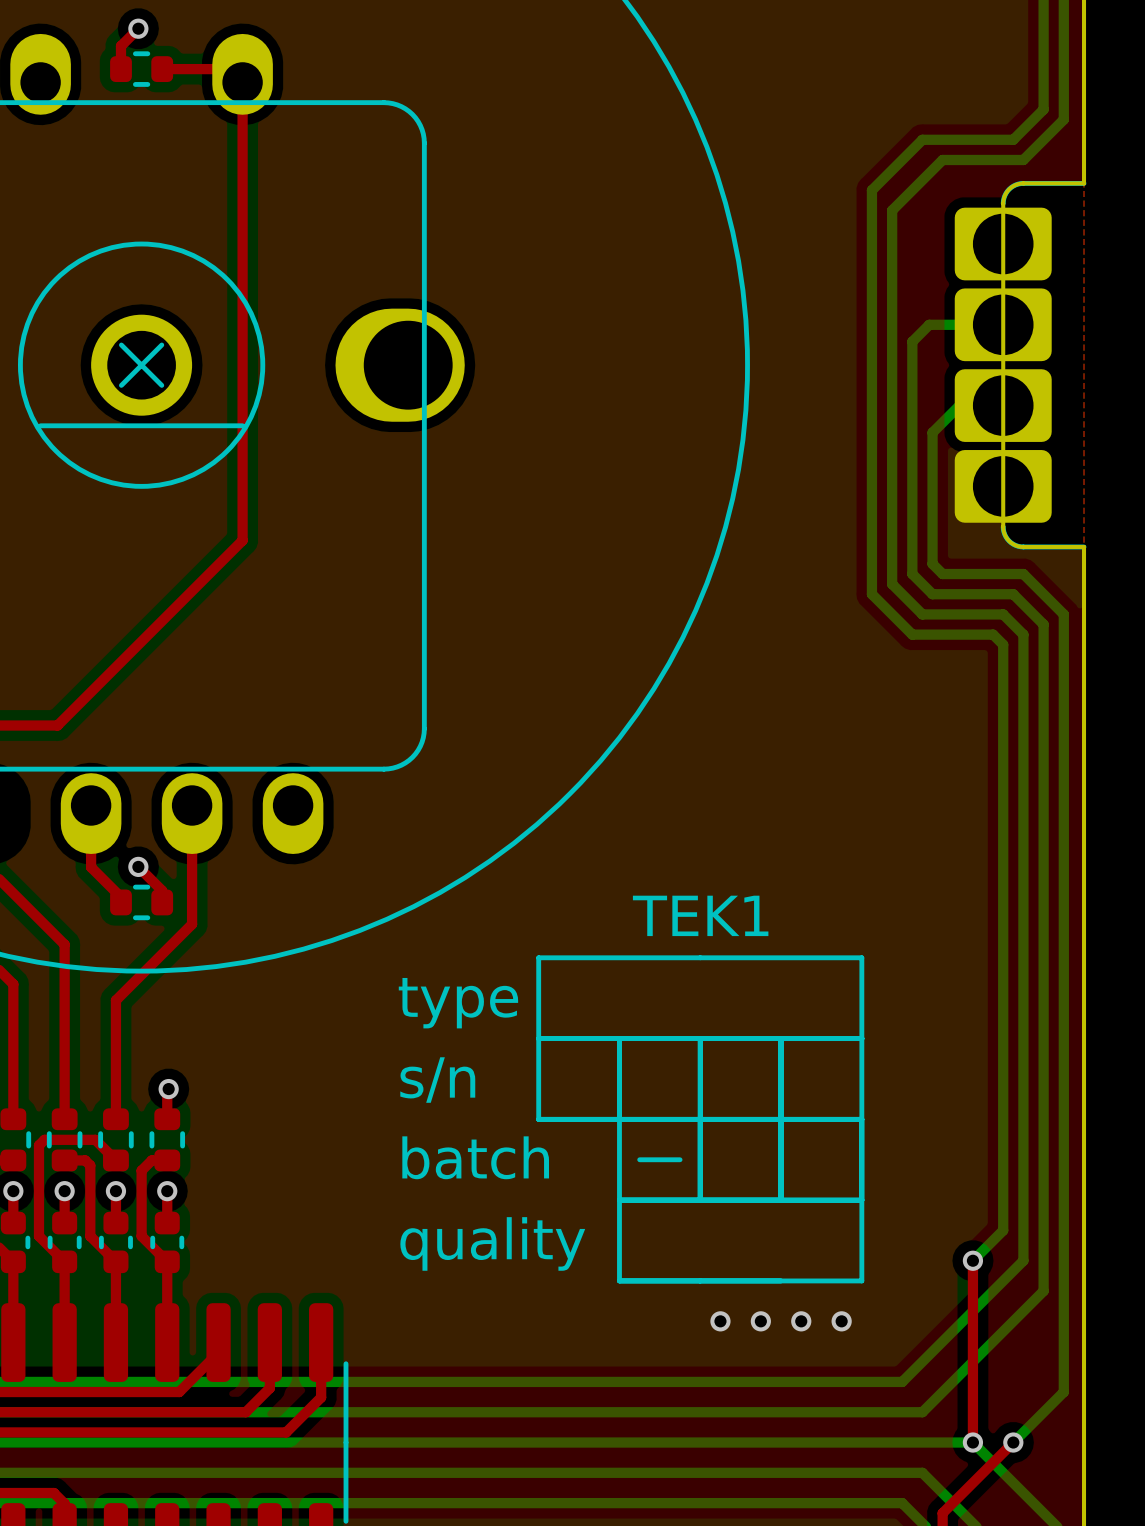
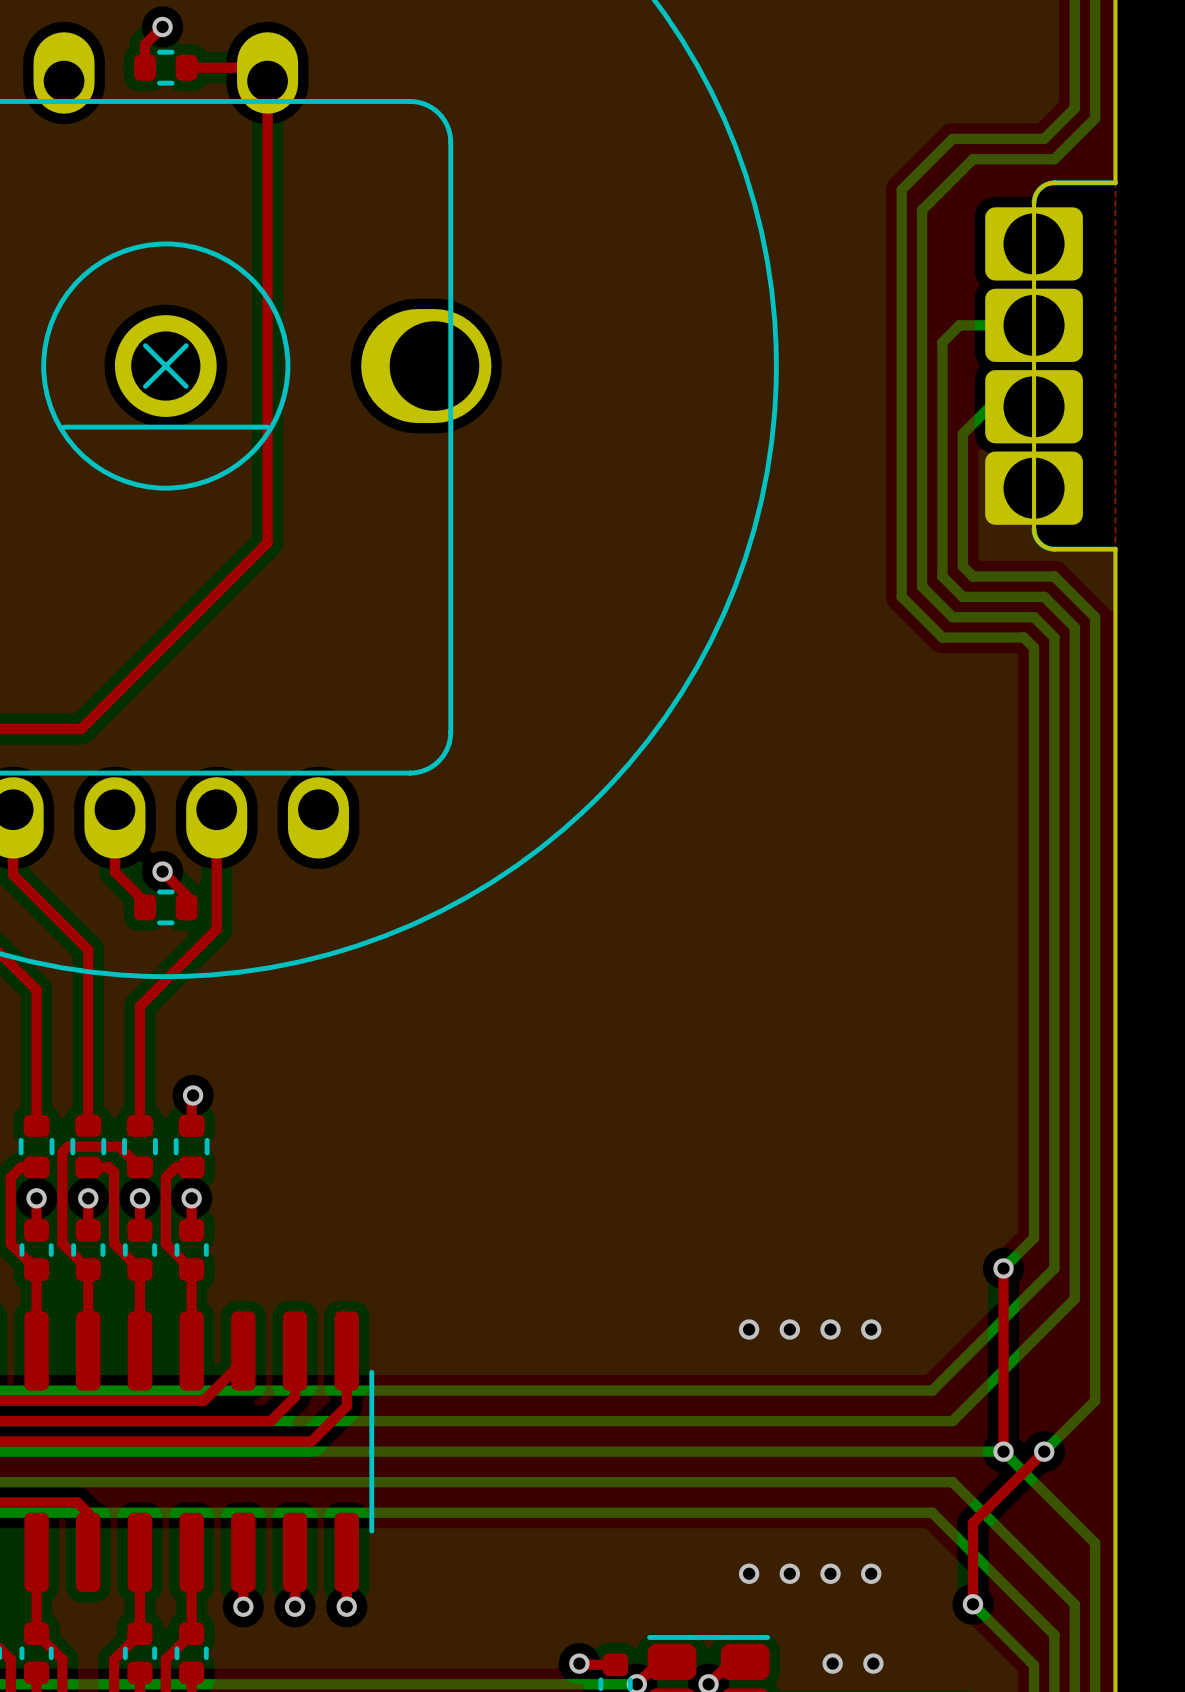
text: TEK1 (700, 915) -> none
text: type (458, 1003) -> none
line: (538, 1038) (861, 1038) -> none
line: (619, 1038) (619, 1280) (861, 1280) (861, 957) (538, 957) (538, 1119) (861, 1119) -> none
line: (700, 1038) (700, 1200) -> none
line: (781, 1038) (781, 1200) -> none
text: s/n (437, 1080) -> none
text: batch (475, 1157) -> none
line: (639, 1159) (680, 1159) -> none
line: (619, 1200) (861, 1200) -> none
text: quality (492, 1243) -> none

